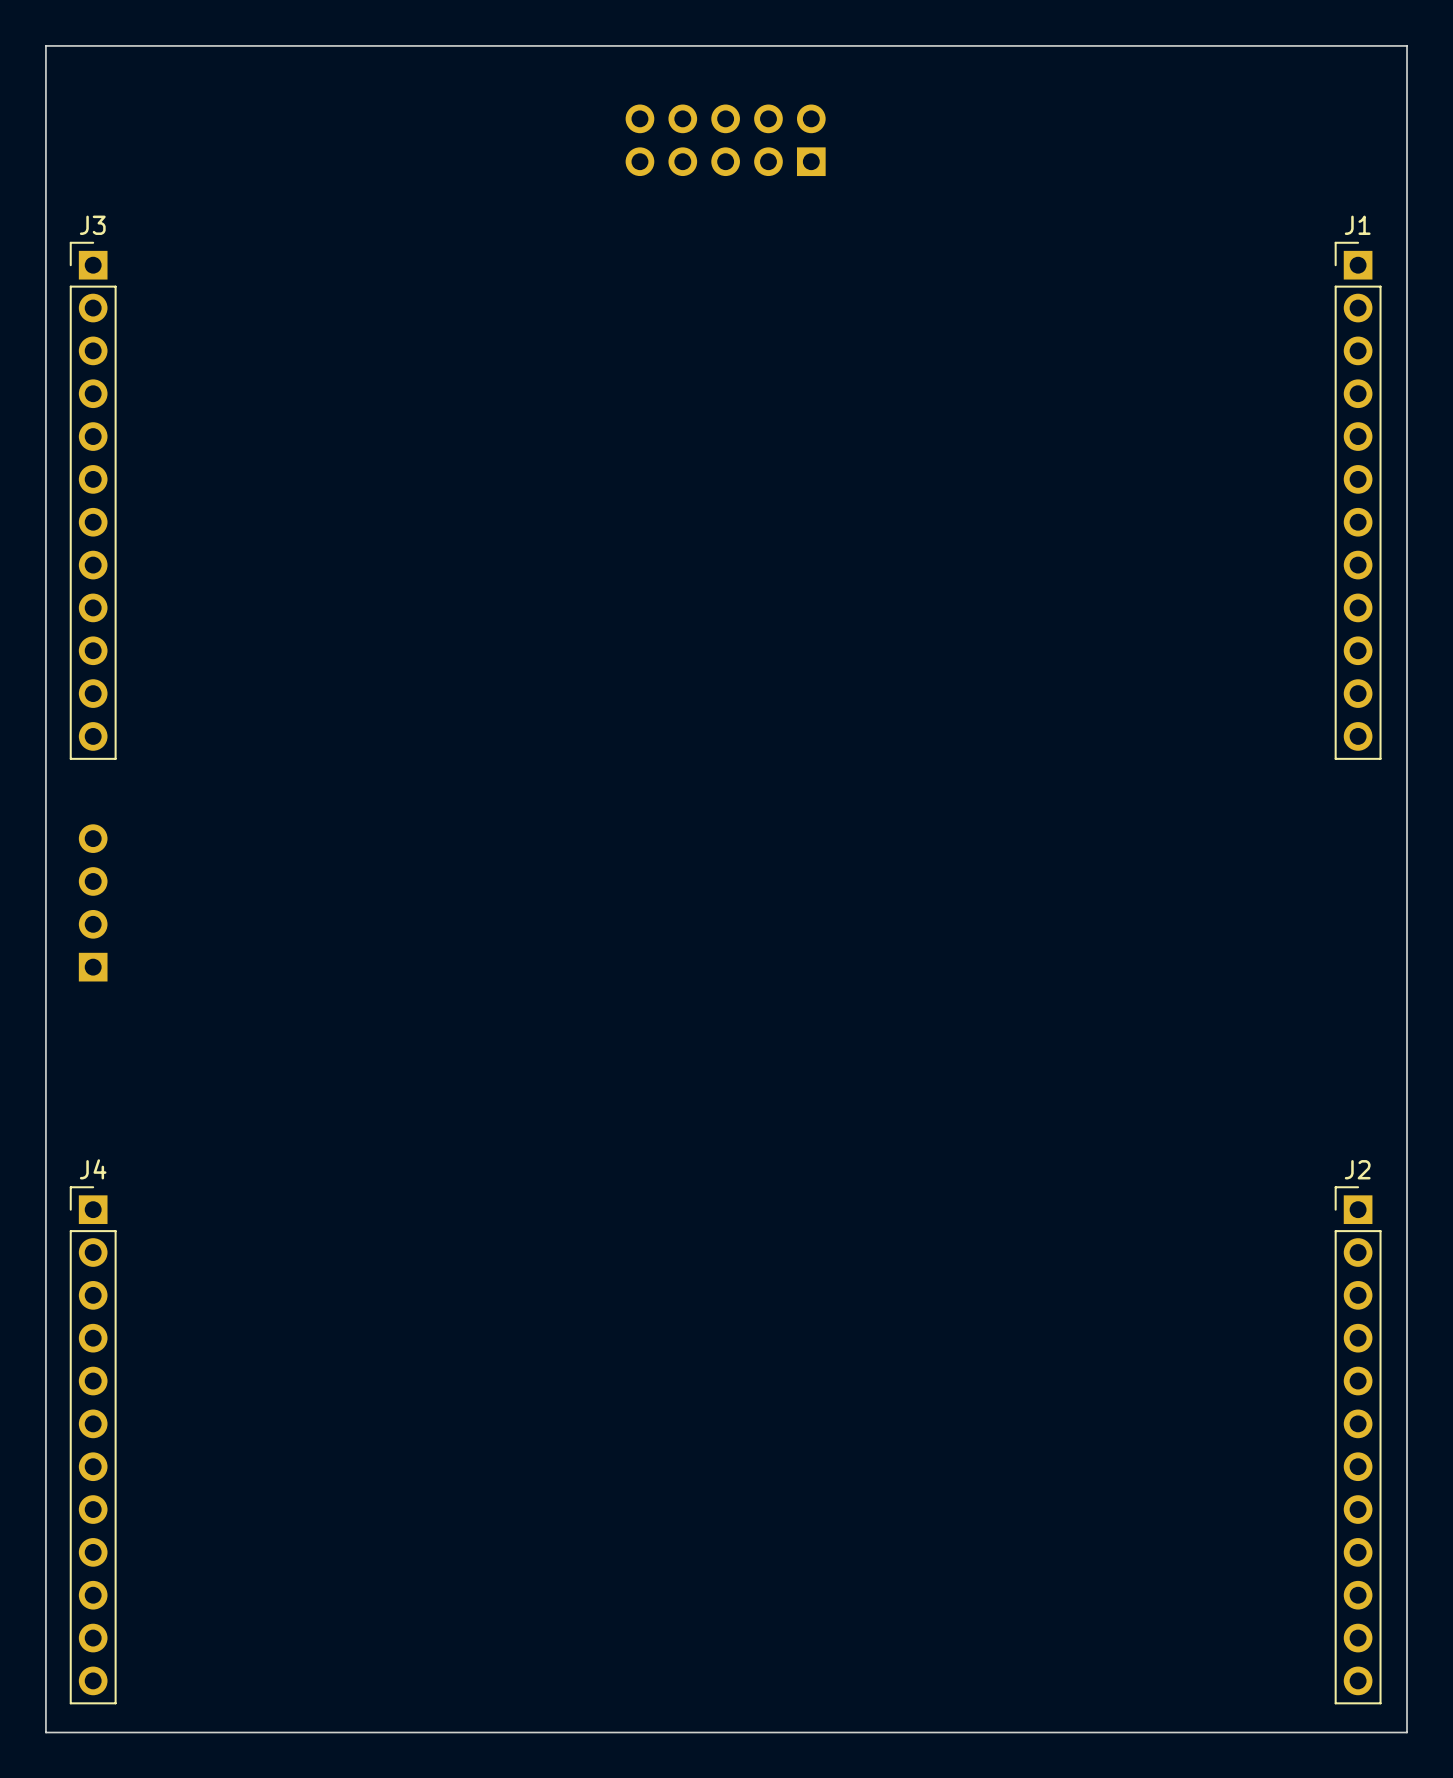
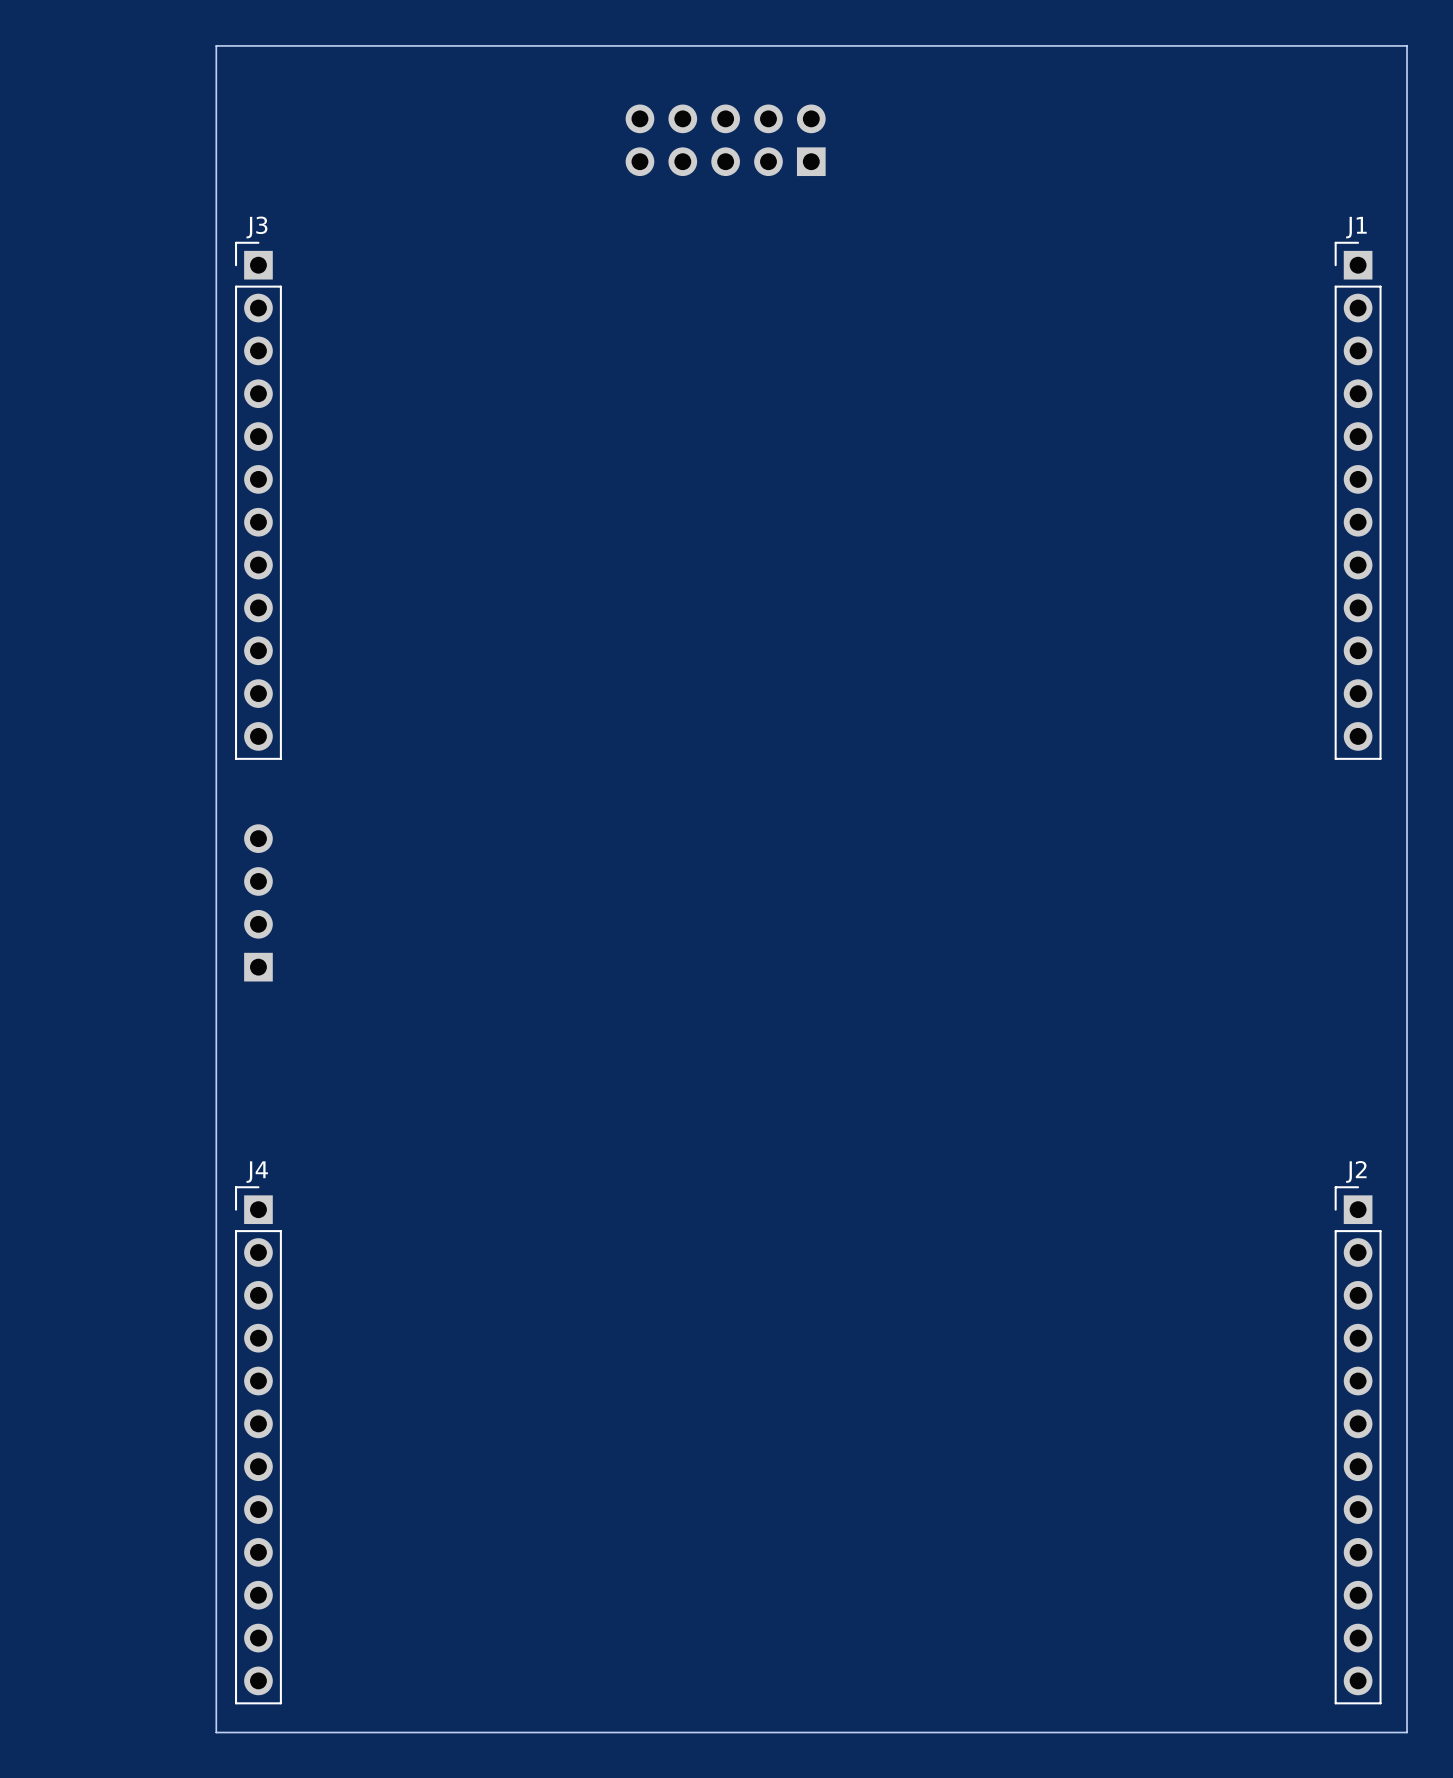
board edge: (216, 45) (45, 45) (45, 1732) (216, 1732) -> (216, 45) (216, 1732)
J3 position: (93, 500) -> (258, 500)
part position: (93, 902) -> (258, 902)
J4 position: (93, 1445) -> (258, 1445)

